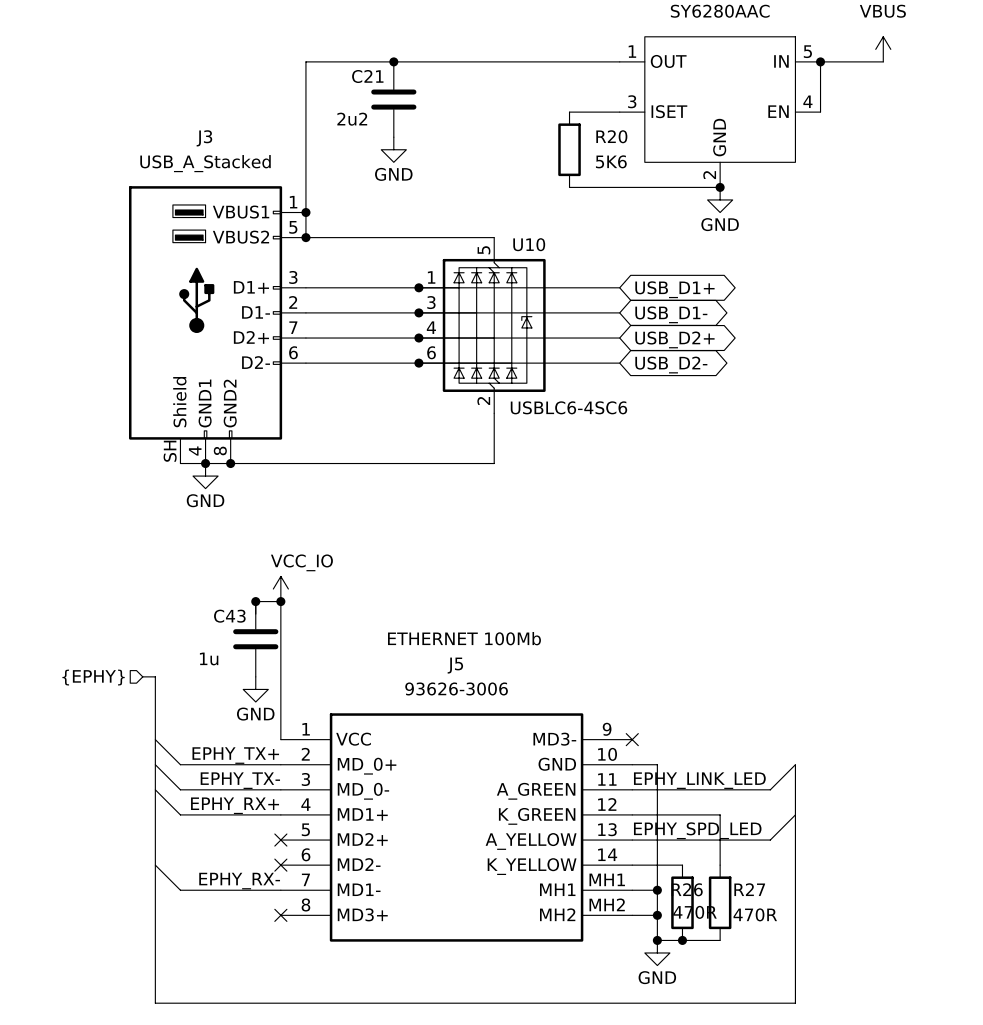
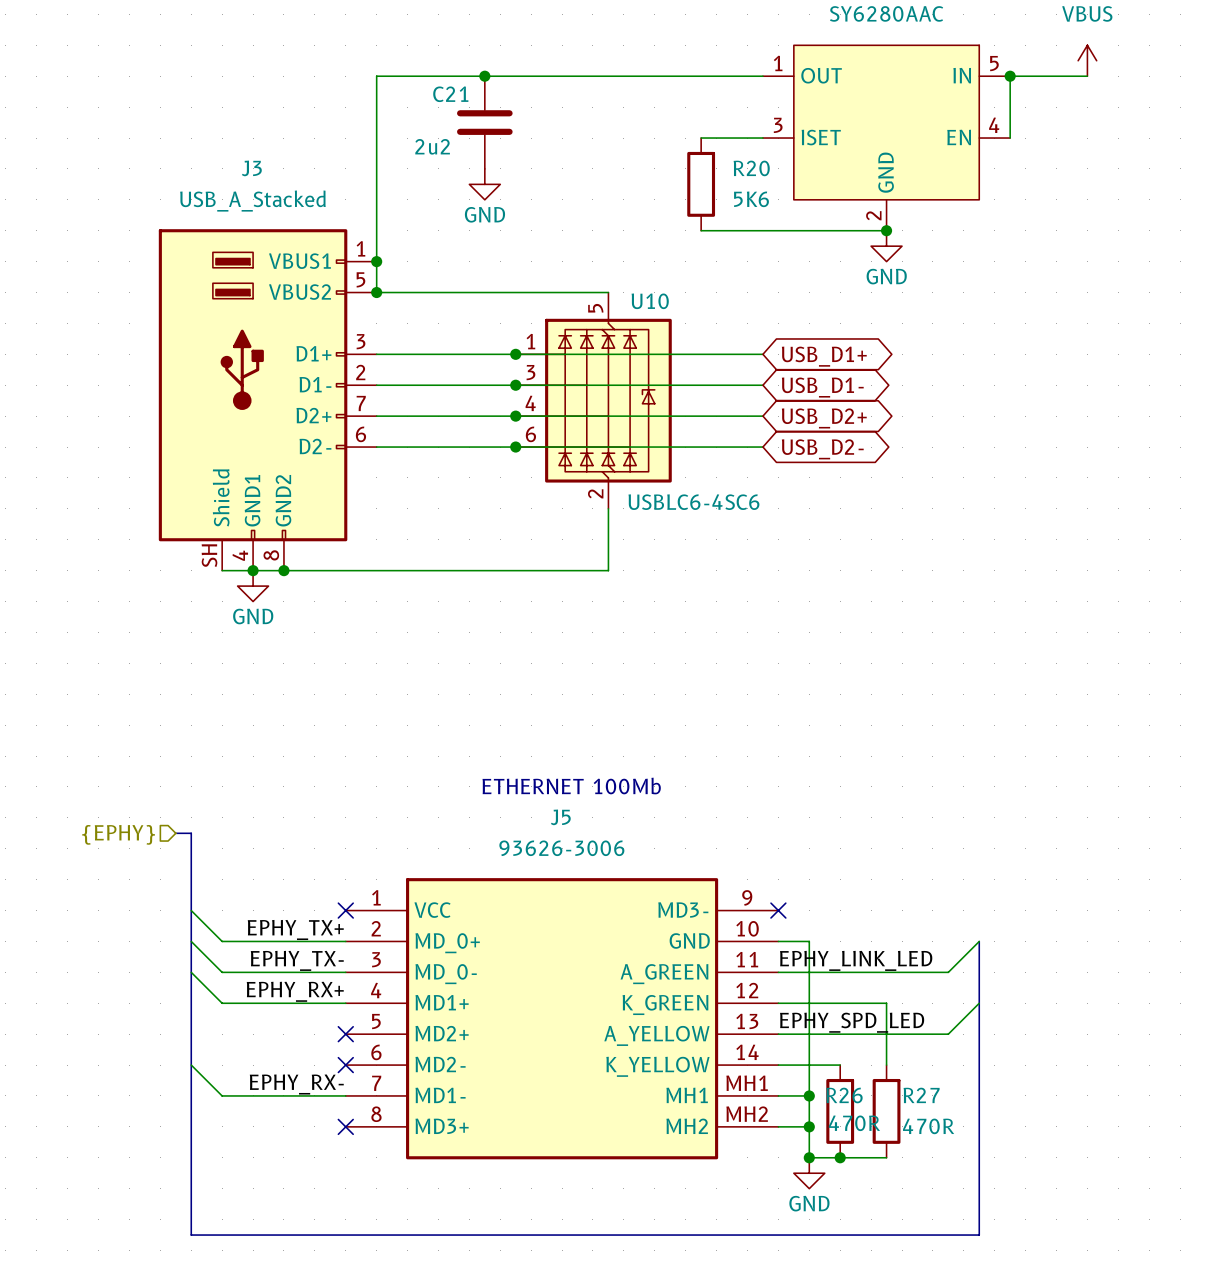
power symbol: VCC_IO (280, 589) -> none
junction: (255, 601) -> none
junction: (280, 601) -> none
wire: (255, 614) (255, 601) (280, 601) (280, 739) -> none
C43: 1u (255, 639) -> none
power symbol: GND (255, 689) -> none
no-connect mark: none -> (345, 910)

